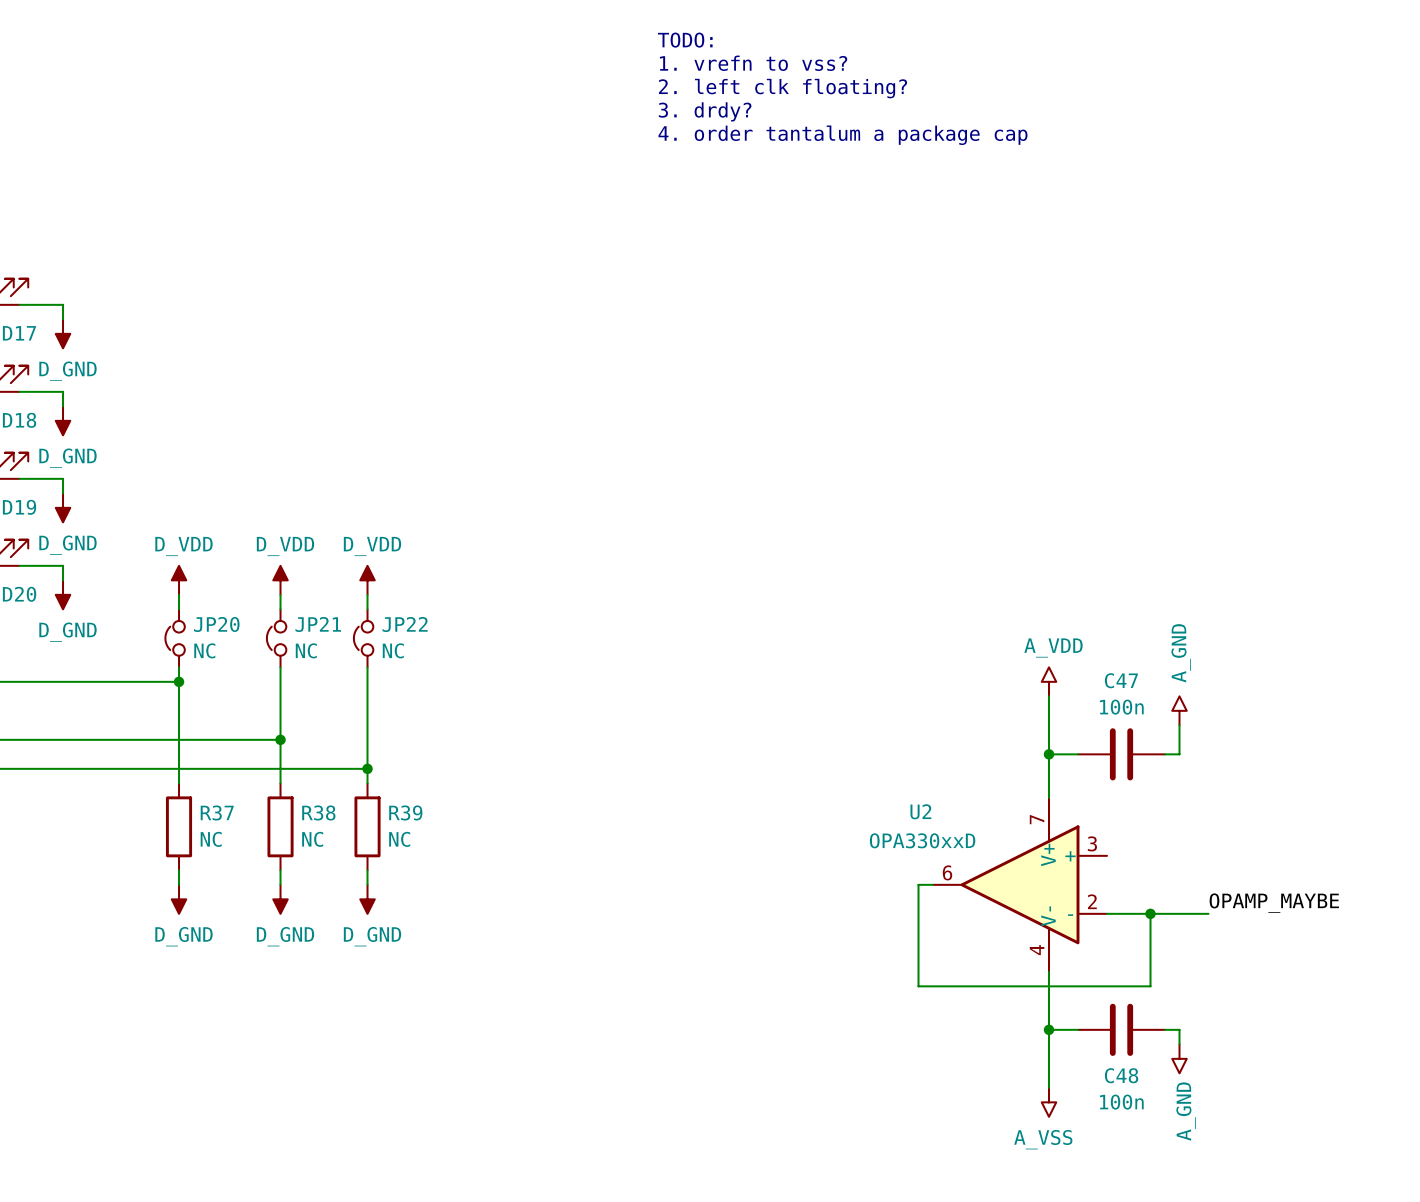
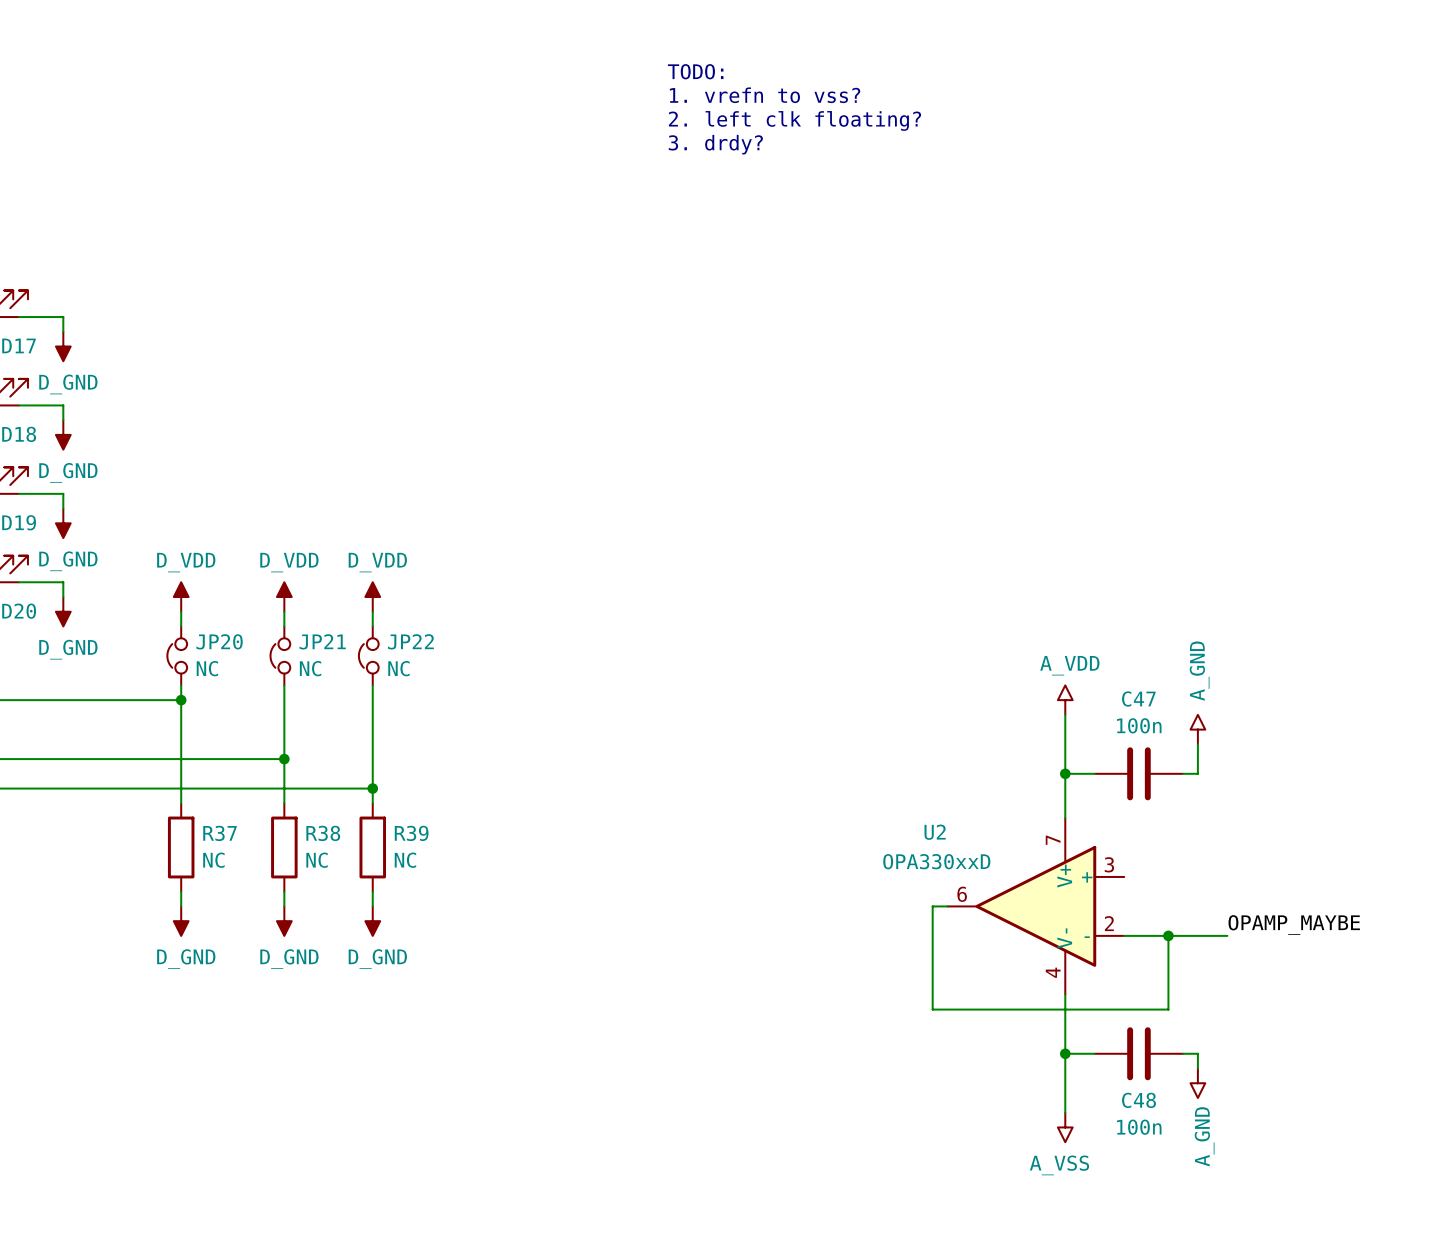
text: TODO: (685, 40) -> none
text: 1. vrefn to vss? (753, 63) -> TODO: (695, 71)
text: 2. left clk floating? (783, 88) -> 1. vrefn to vss? (765, 95)
text: 3. drdy? (705, 111) -> 2. left clk floating? (795, 120)
text: 4. order tantalum a package cap (842, 135) -> 3. drdy? (715, 144)

